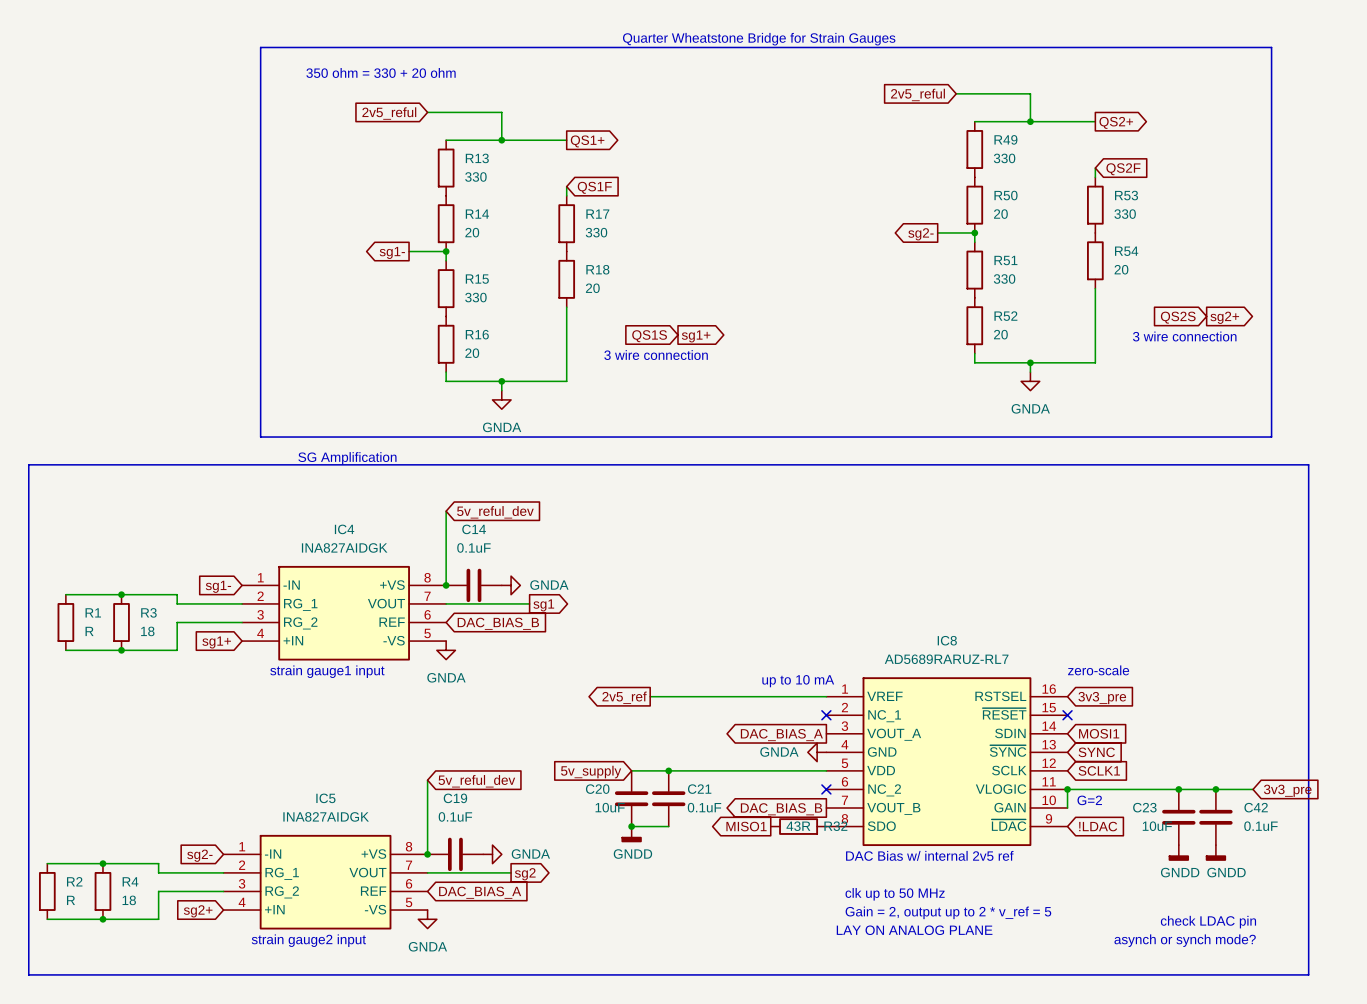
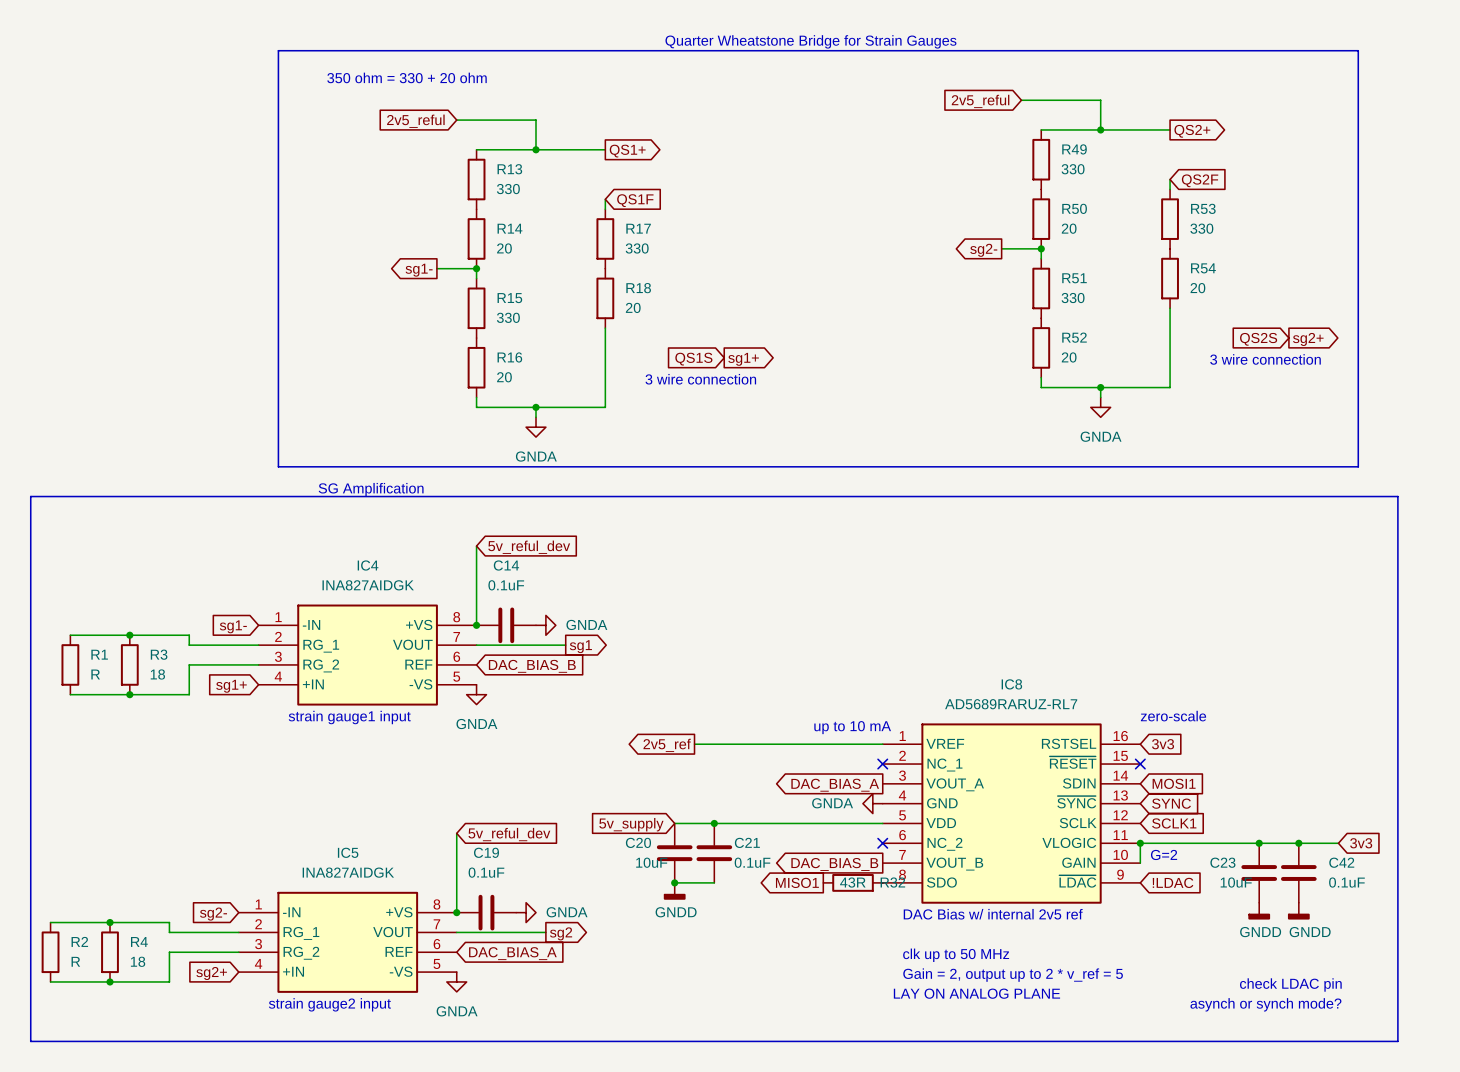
global label: 3v3_pre (1102, 698) -> 3v3 (1163, 744)
global label: 3v3_pre (1287, 790) -> 3v3 (1361, 843)

